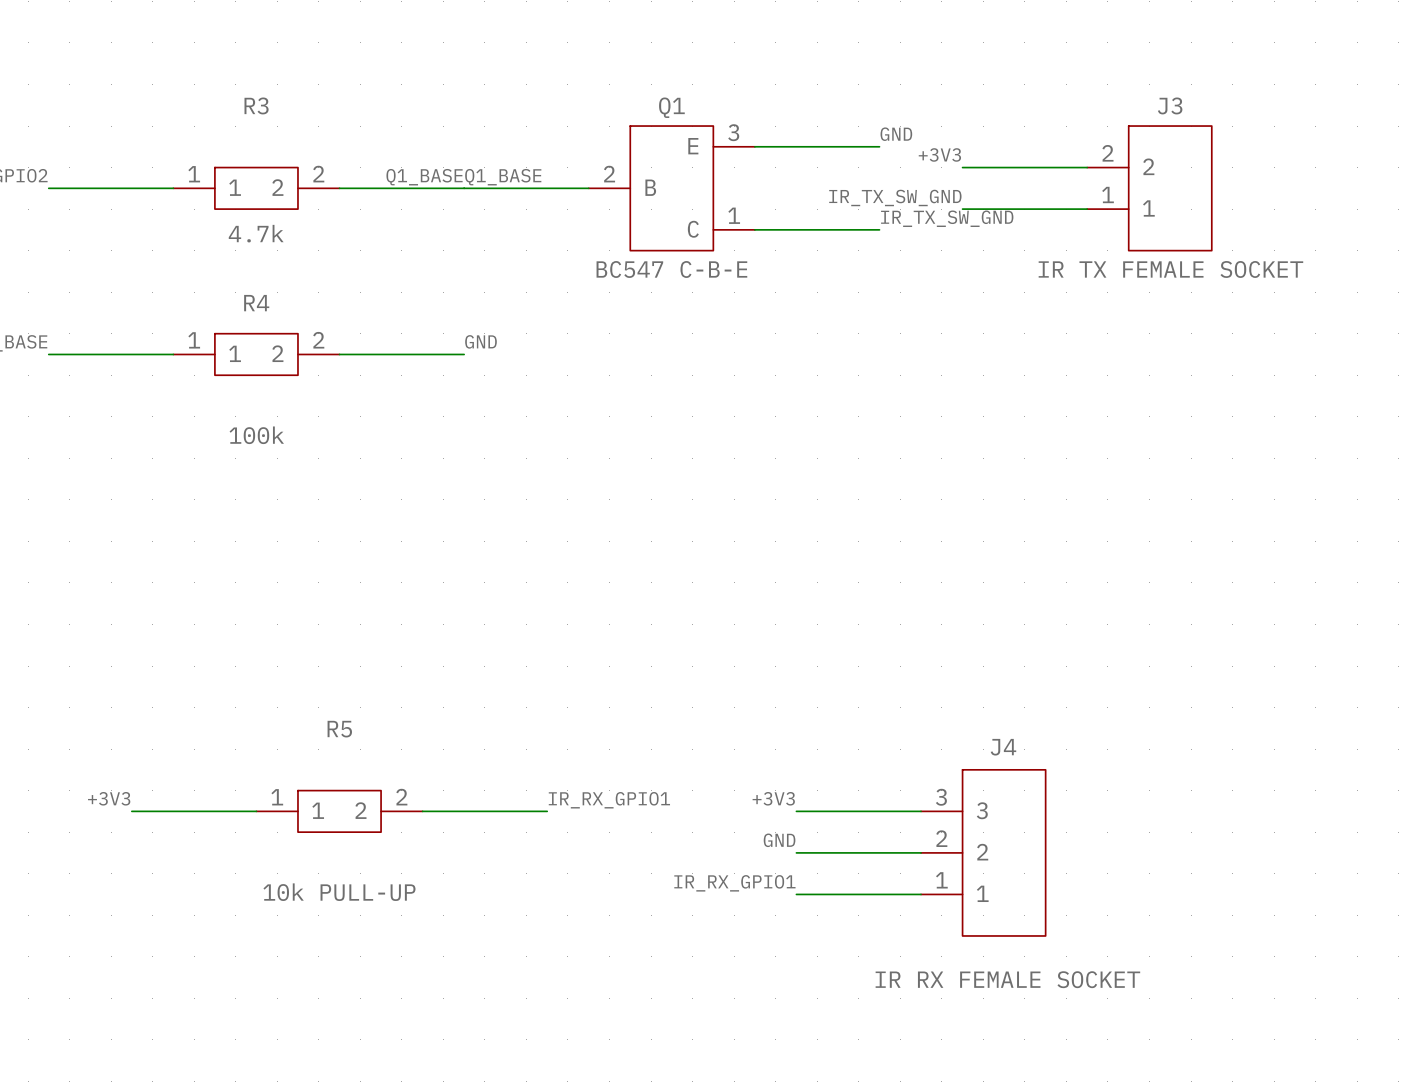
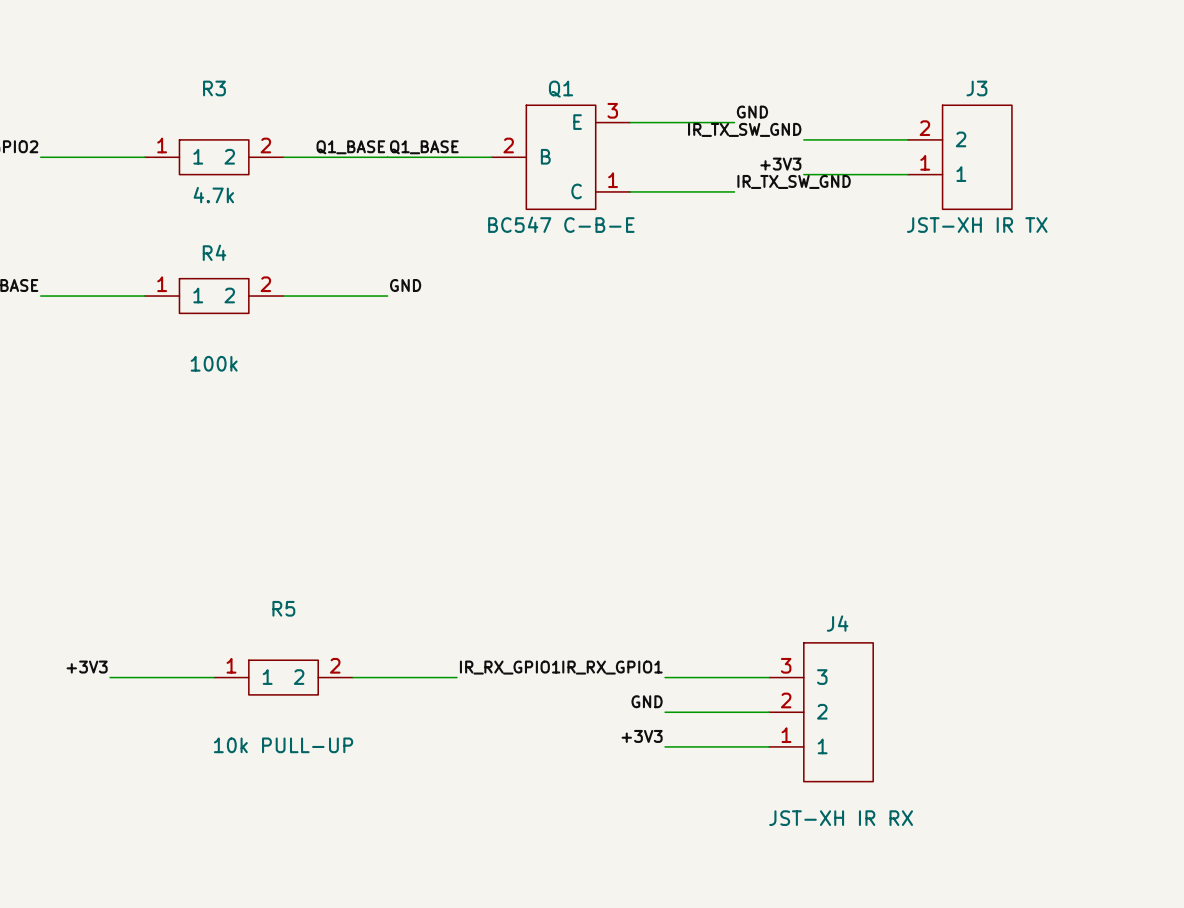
label: +3V3 (939, 154) -> IR_TX_SW_GND (744, 129)
label: IR_TX_SW_GND (895, 197) -> +3V3 (780, 164)
J3 value: IR TX FEMALE SOCKET (1170, 269) -> JST-XH IR TX (977, 225)
label: +3V3 (773, 798) -> IR_RX_GPIO1 (612, 667)
label: IR_RX_GPIO1 (734, 883) -> +3V3 (642, 736)
J4 value: IR RX FEMALE SOCKET (1007, 979) -> JST-XH IR RX (841, 818)

